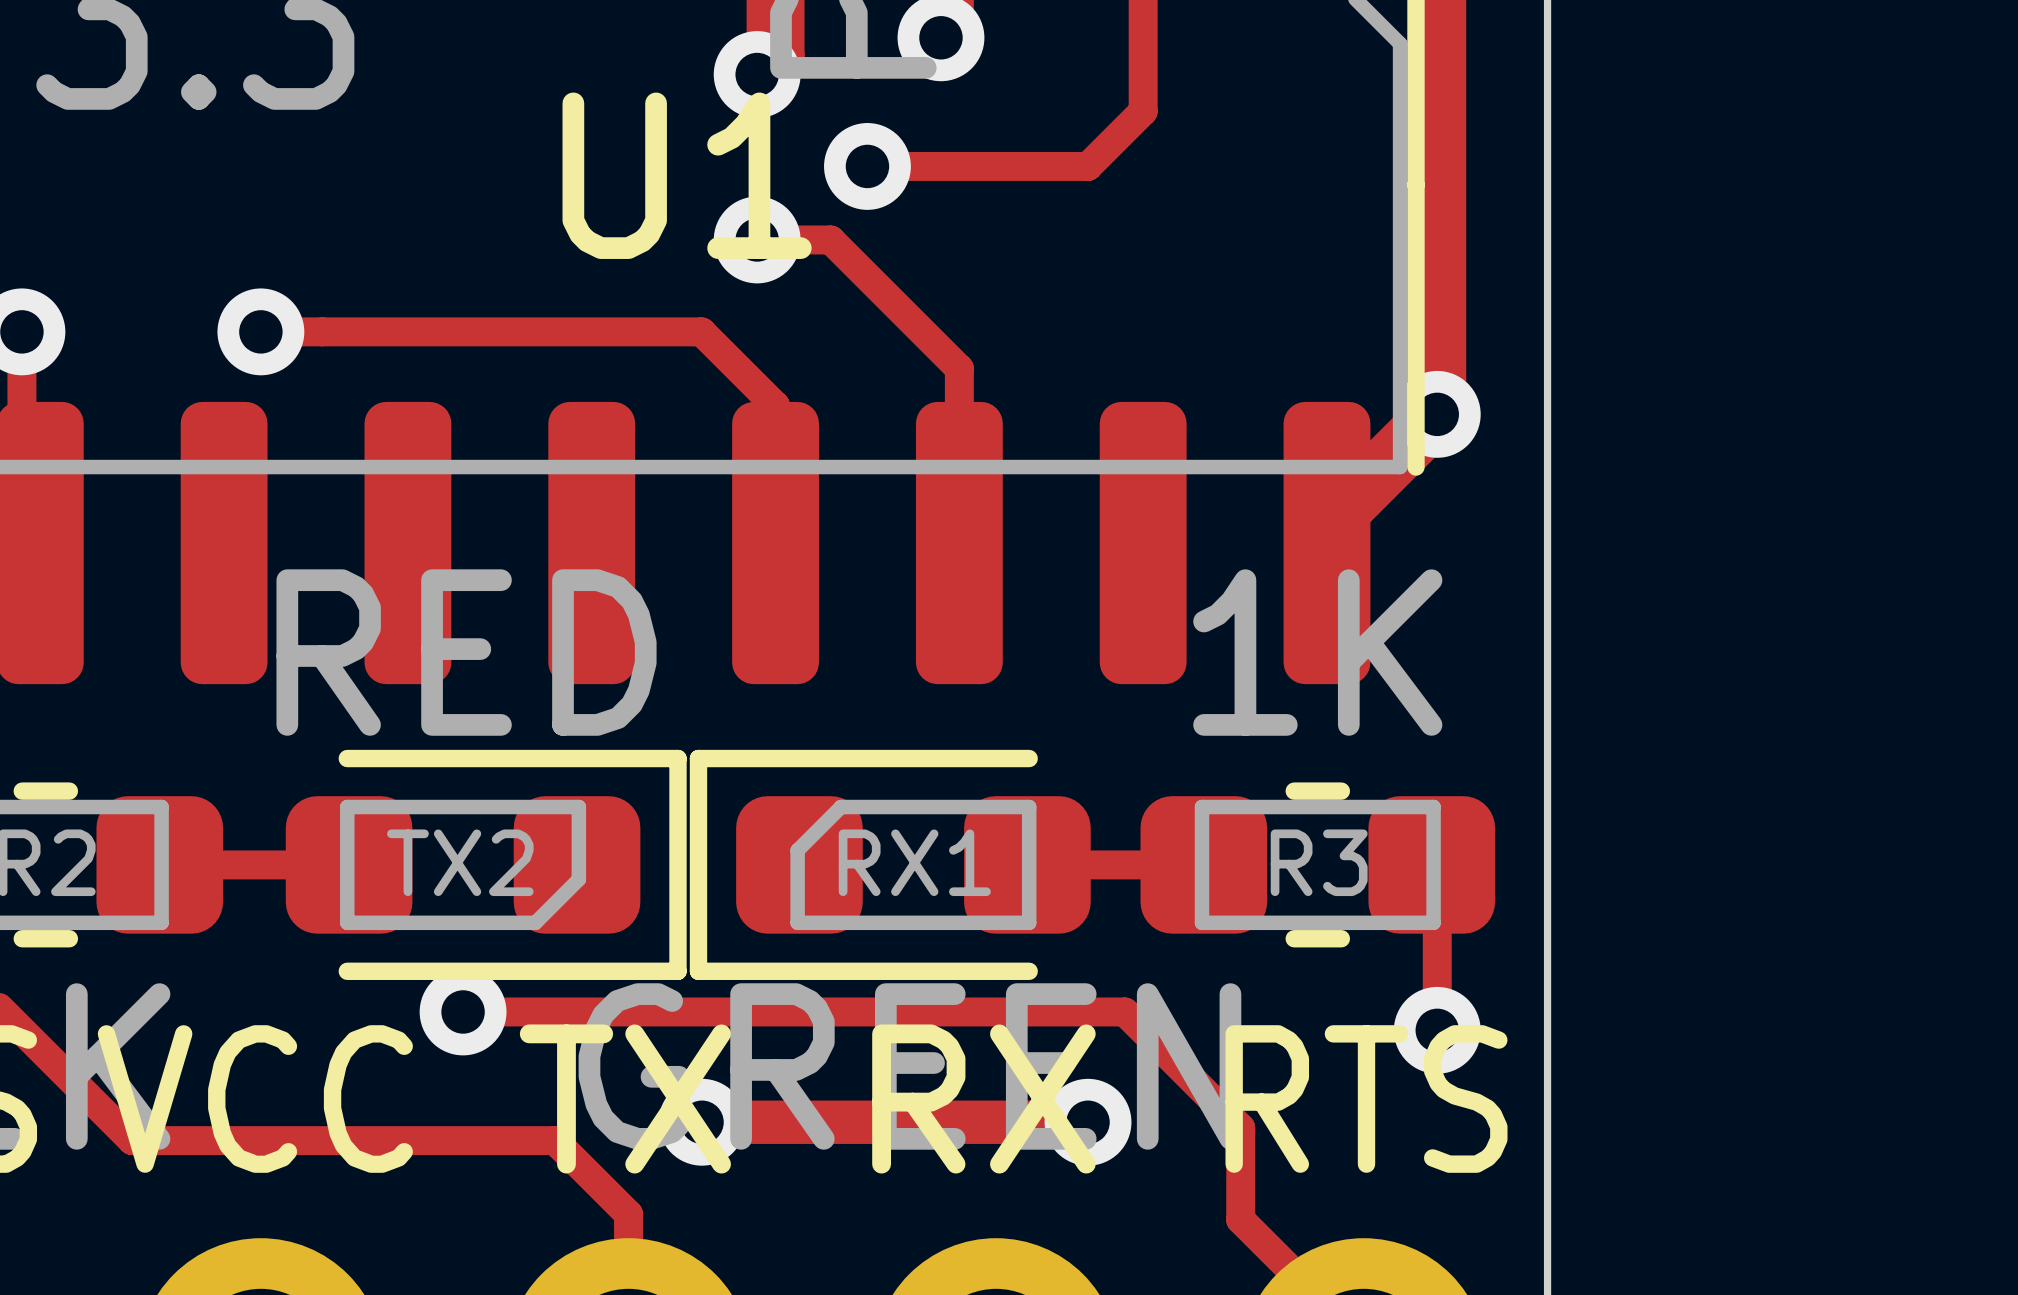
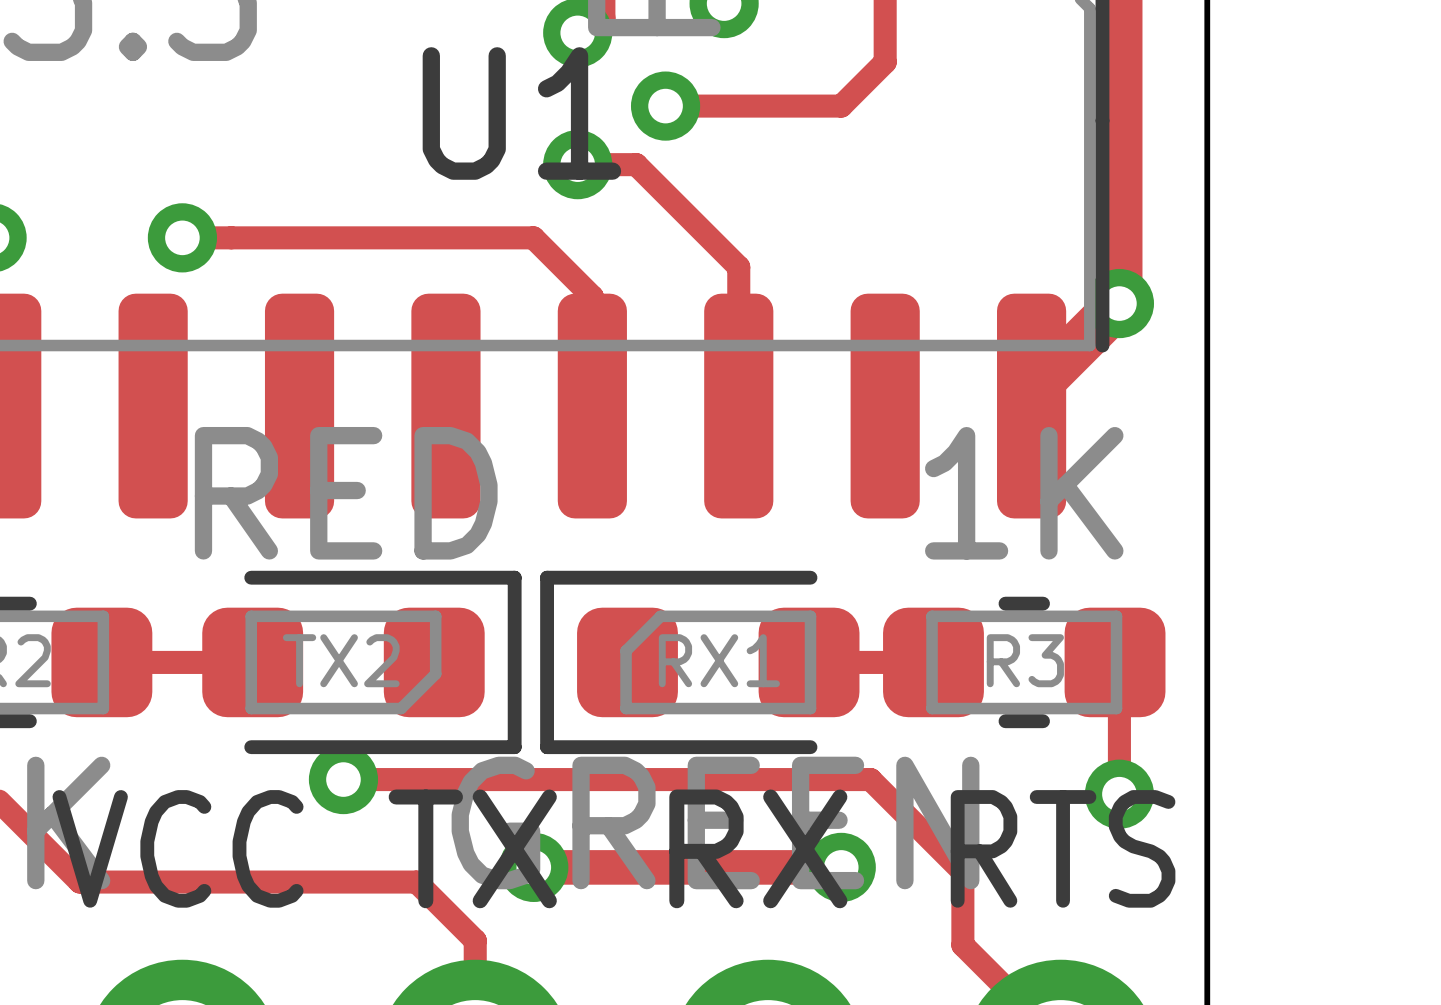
RX1 position: (890, 864) -> (699, 662)

